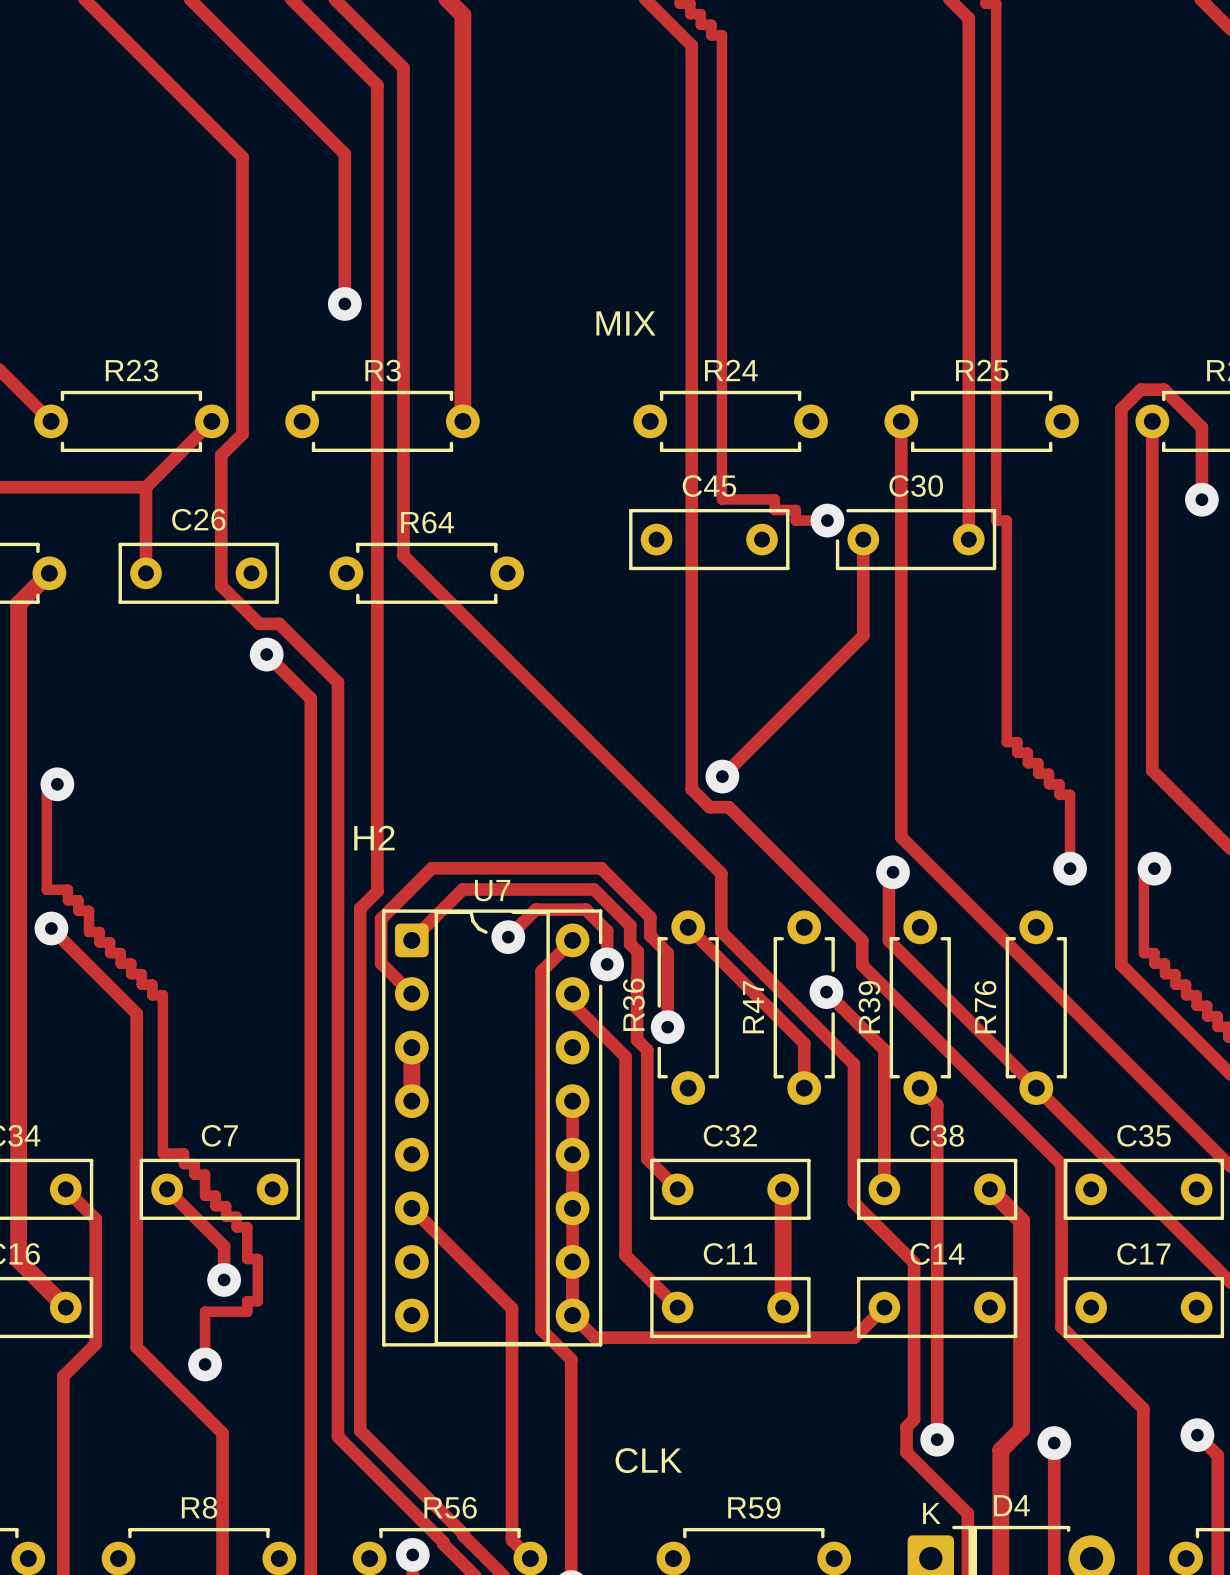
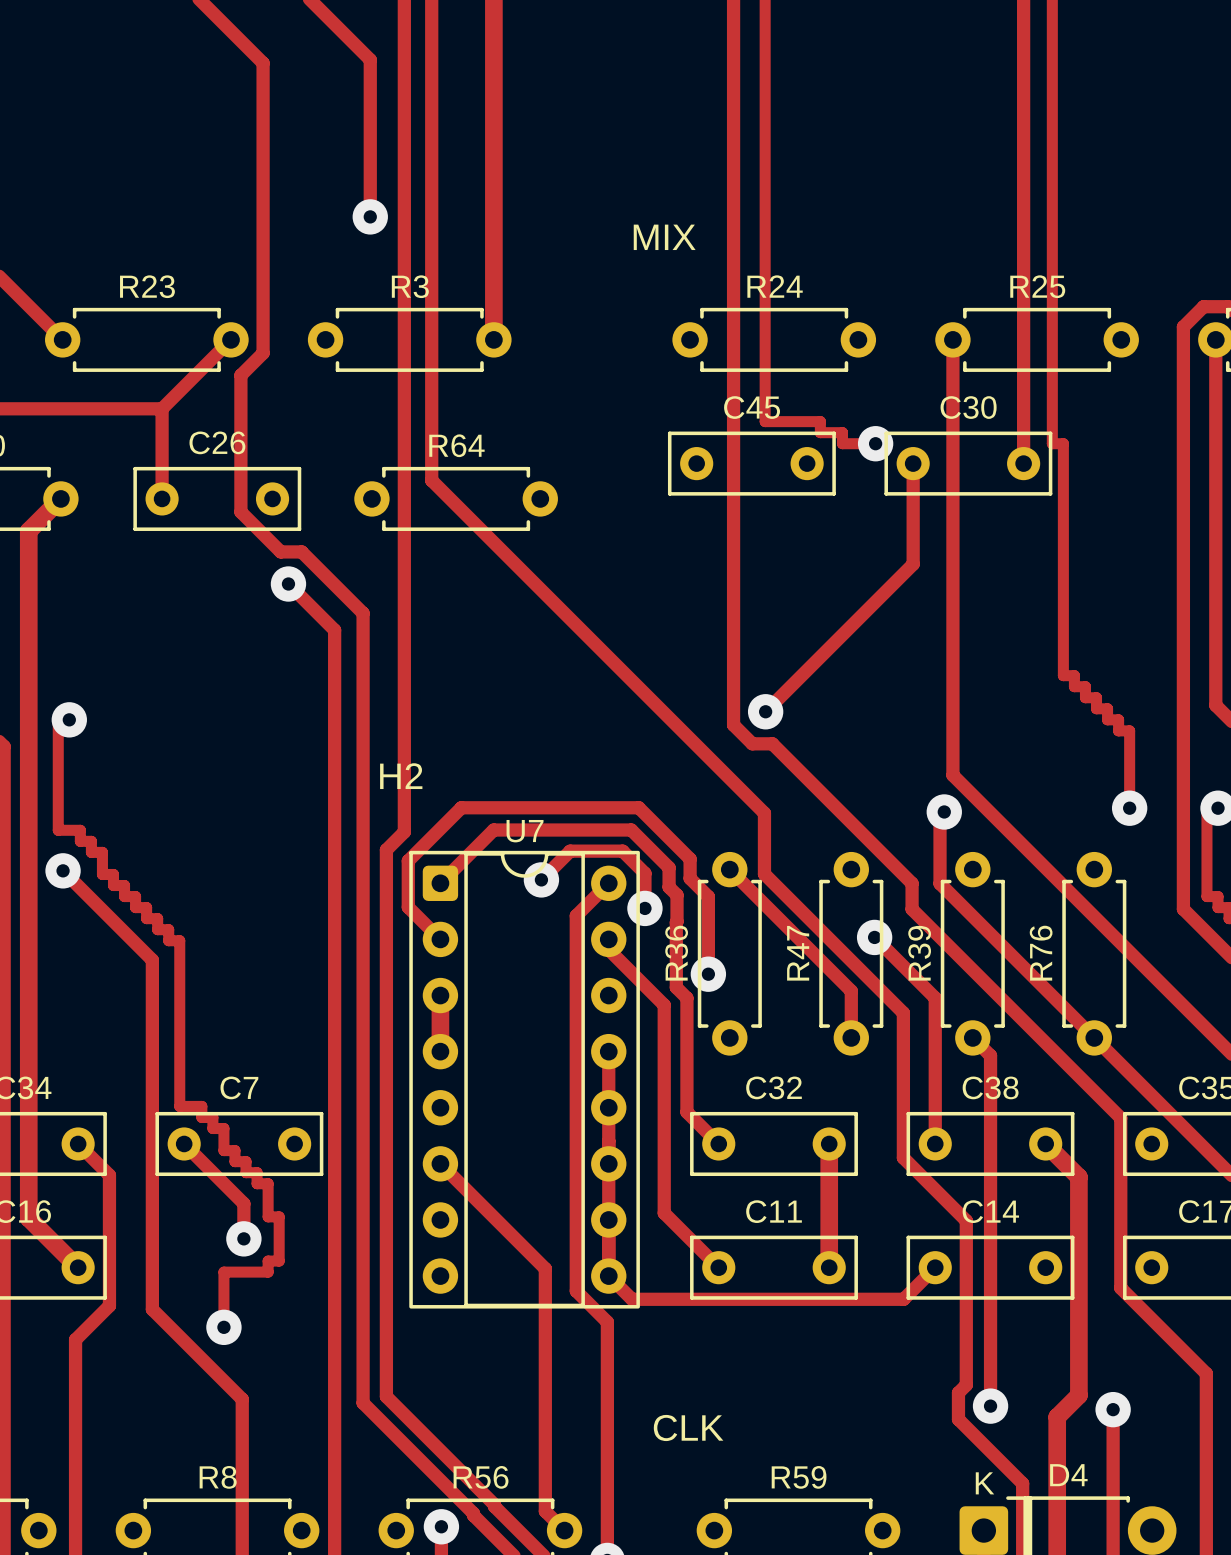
C30 footprint: [835, 508, 997, 571] -> [884, 431, 1053, 496]
U7 footprint: [382, 909, 603, 1347] -> [409, 850, 640, 1309]
R36 footprint: [657, 910, 719, 1105] -> [697, 851, 762, 1056]
R47 footprint: [773, 910, 835, 1105] -> [819, 851, 884, 1056]

